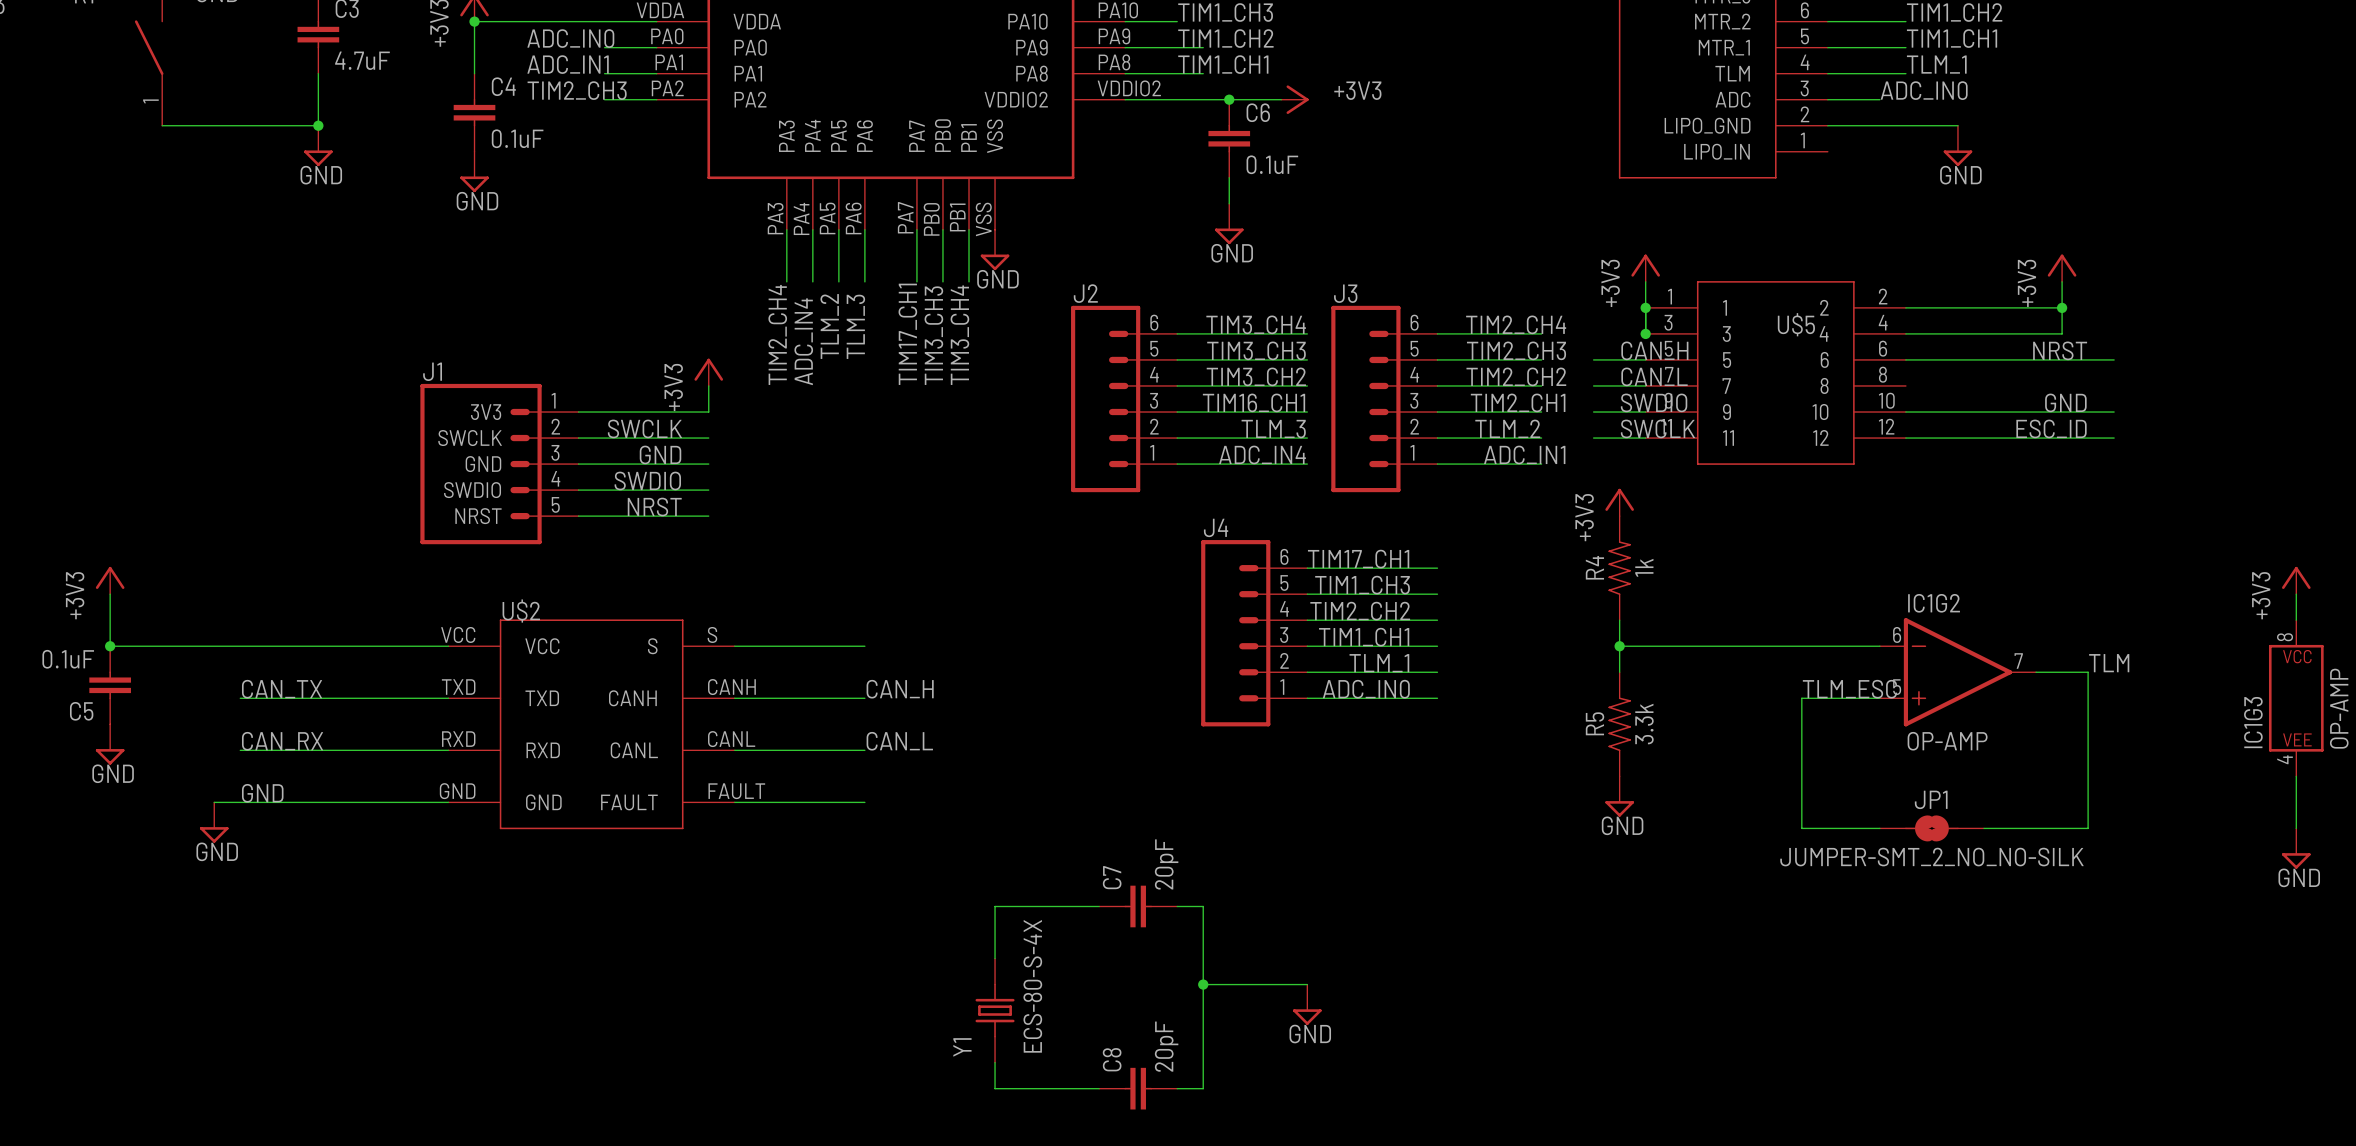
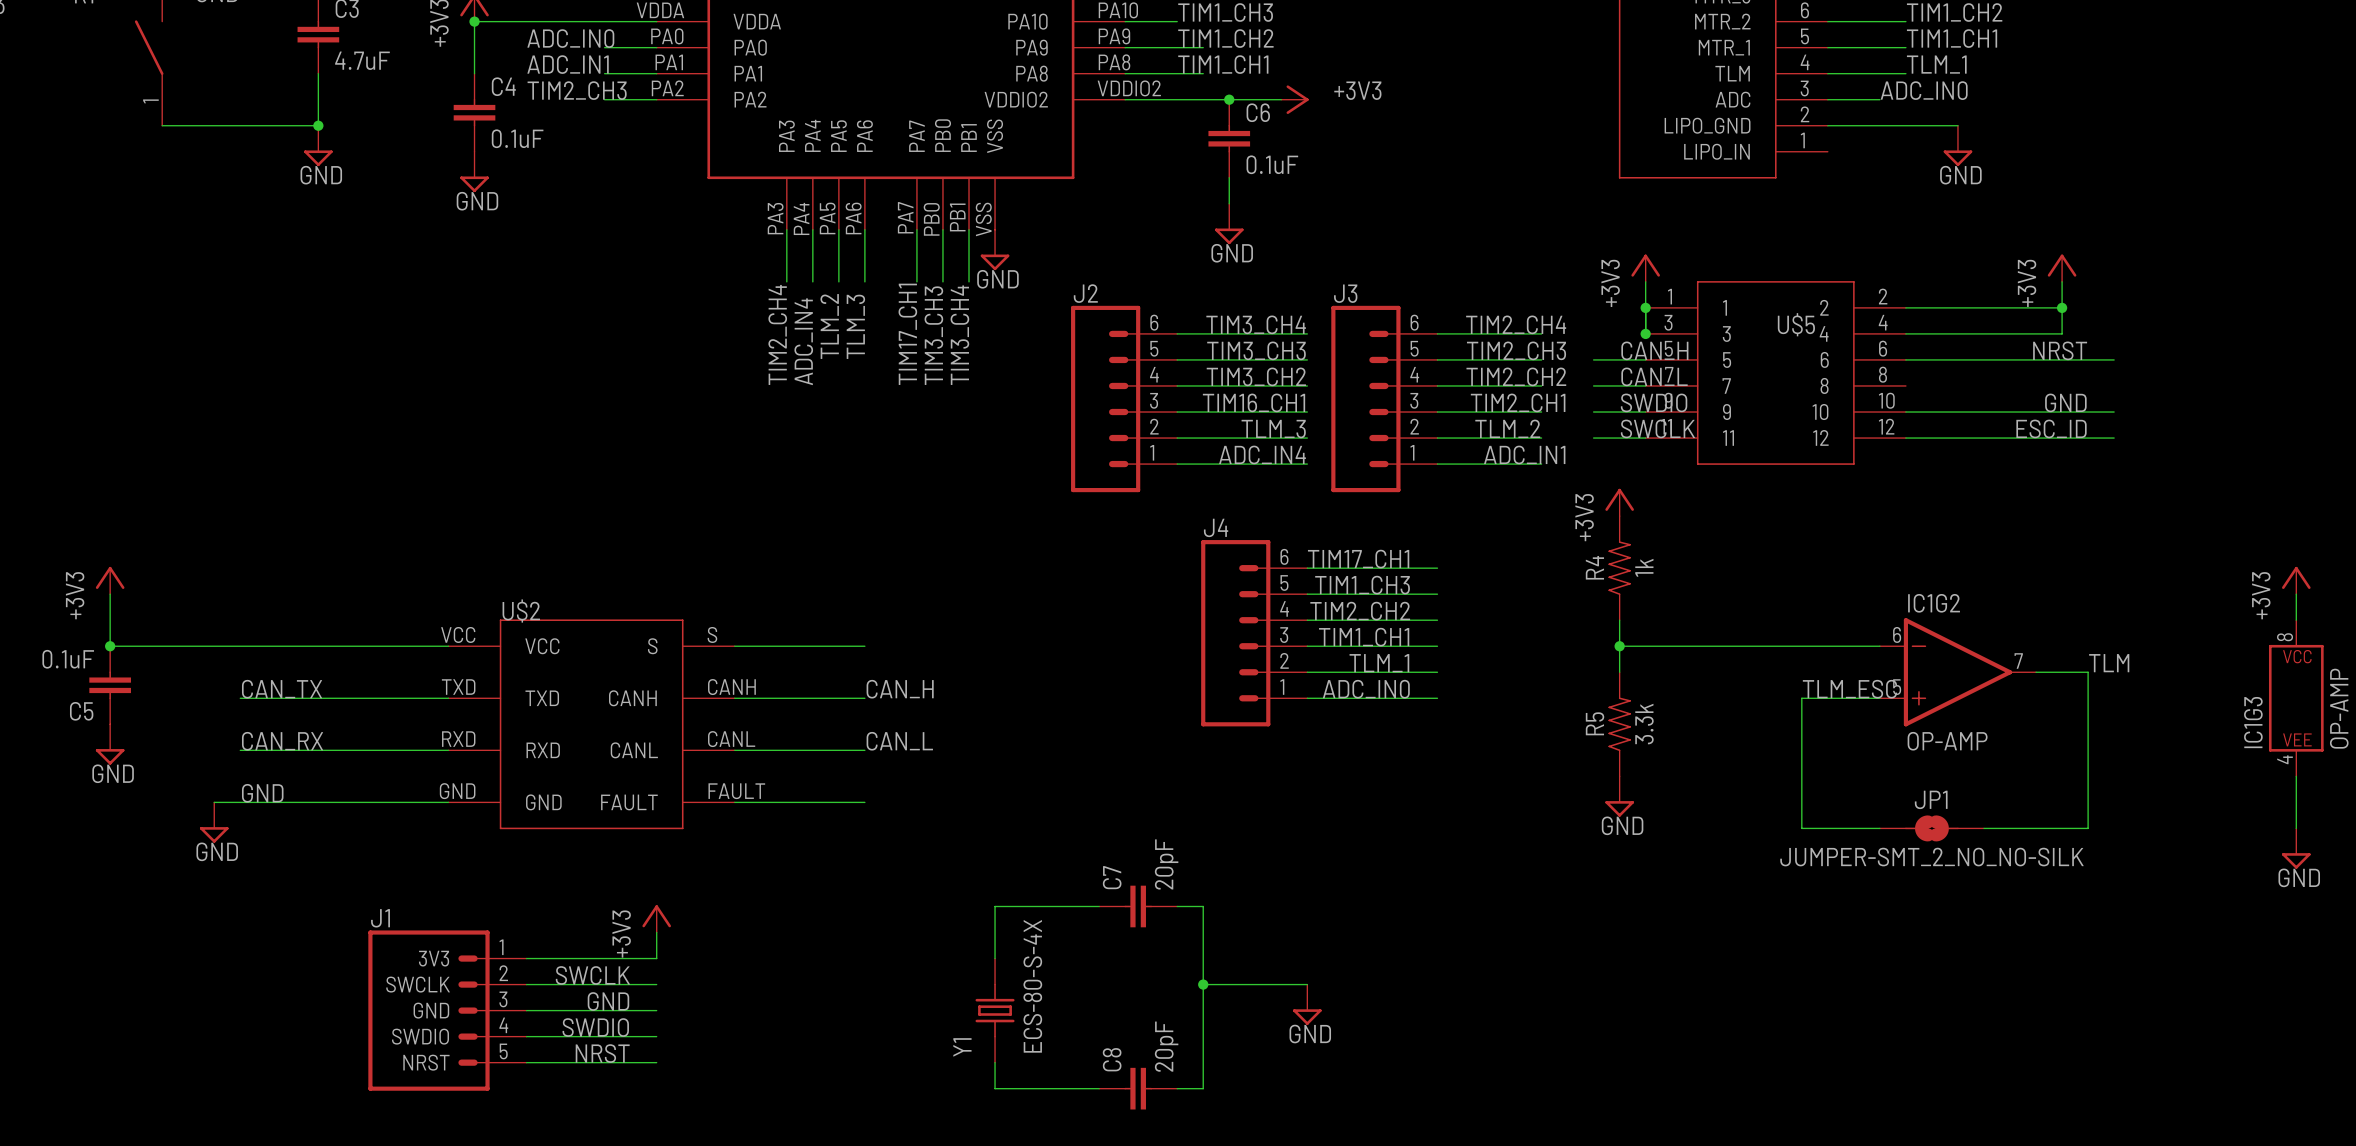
power symbol: +3V3 (708, 372) -> none
wire: (708, 385) (708, 412) (578, 412) -> none
label: SWCLK (644, 428) -> none
wire: (578, 438) (708, 438) -> none
label: GND (660, 454) -> none
J1 position: (499, 464) -> (447, 1010)
wire: (578, 464) (708, 464) -> none
label: SWDIO (647, 480) -> none
wire: (578, 490) (708, 490) -> none
label: NRST (654, 507) -> none
wire: (578, 516) (708, 516) -> none
power symbol: none -> +3V3 (656, 918)
wire: none -> (656, 932) (656, 958) (526, 958)
label: none -> SWCLK (592, 975)
wire: none -> (526, 984) (656, 984)
label: none -> GND (608, 1001)
wire: none -> (526, 1010) (656, 1010)
label: none -> SWDIO (595, 1027)
wire: none -> (526, 1036) (656, 1036)
label: none -> NRST (602, 1053)
wire: none -> (526, 1062) (656, 1062)

